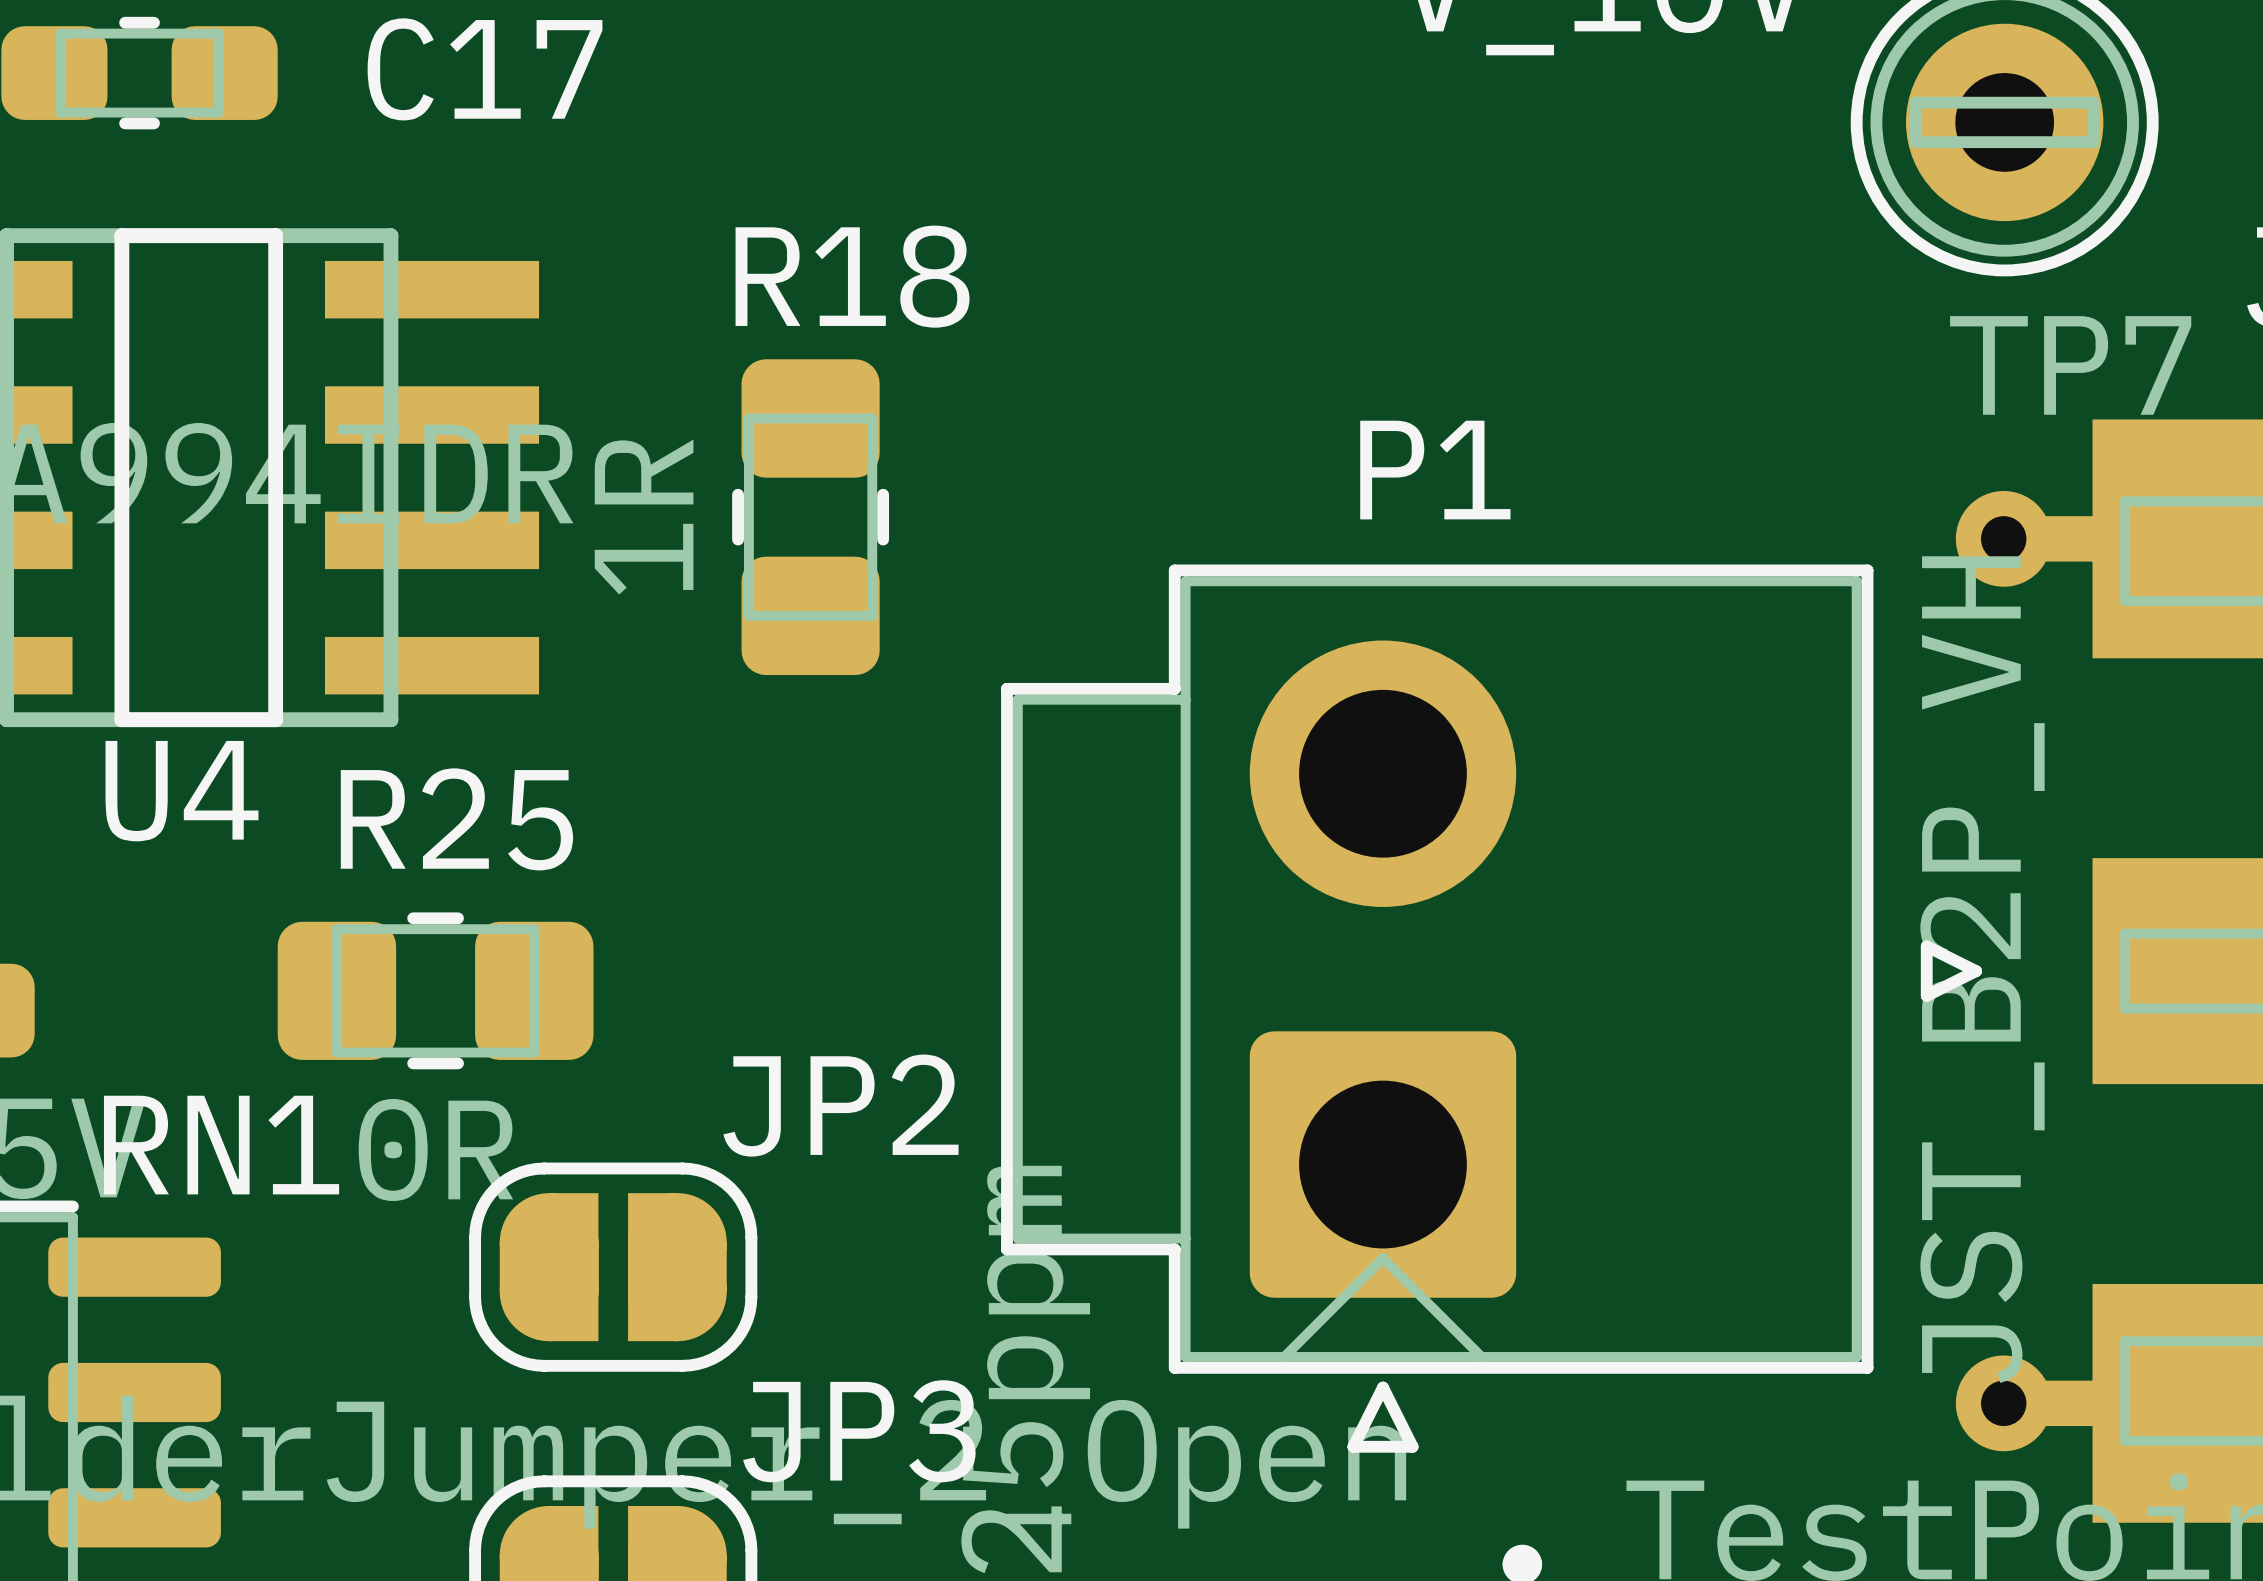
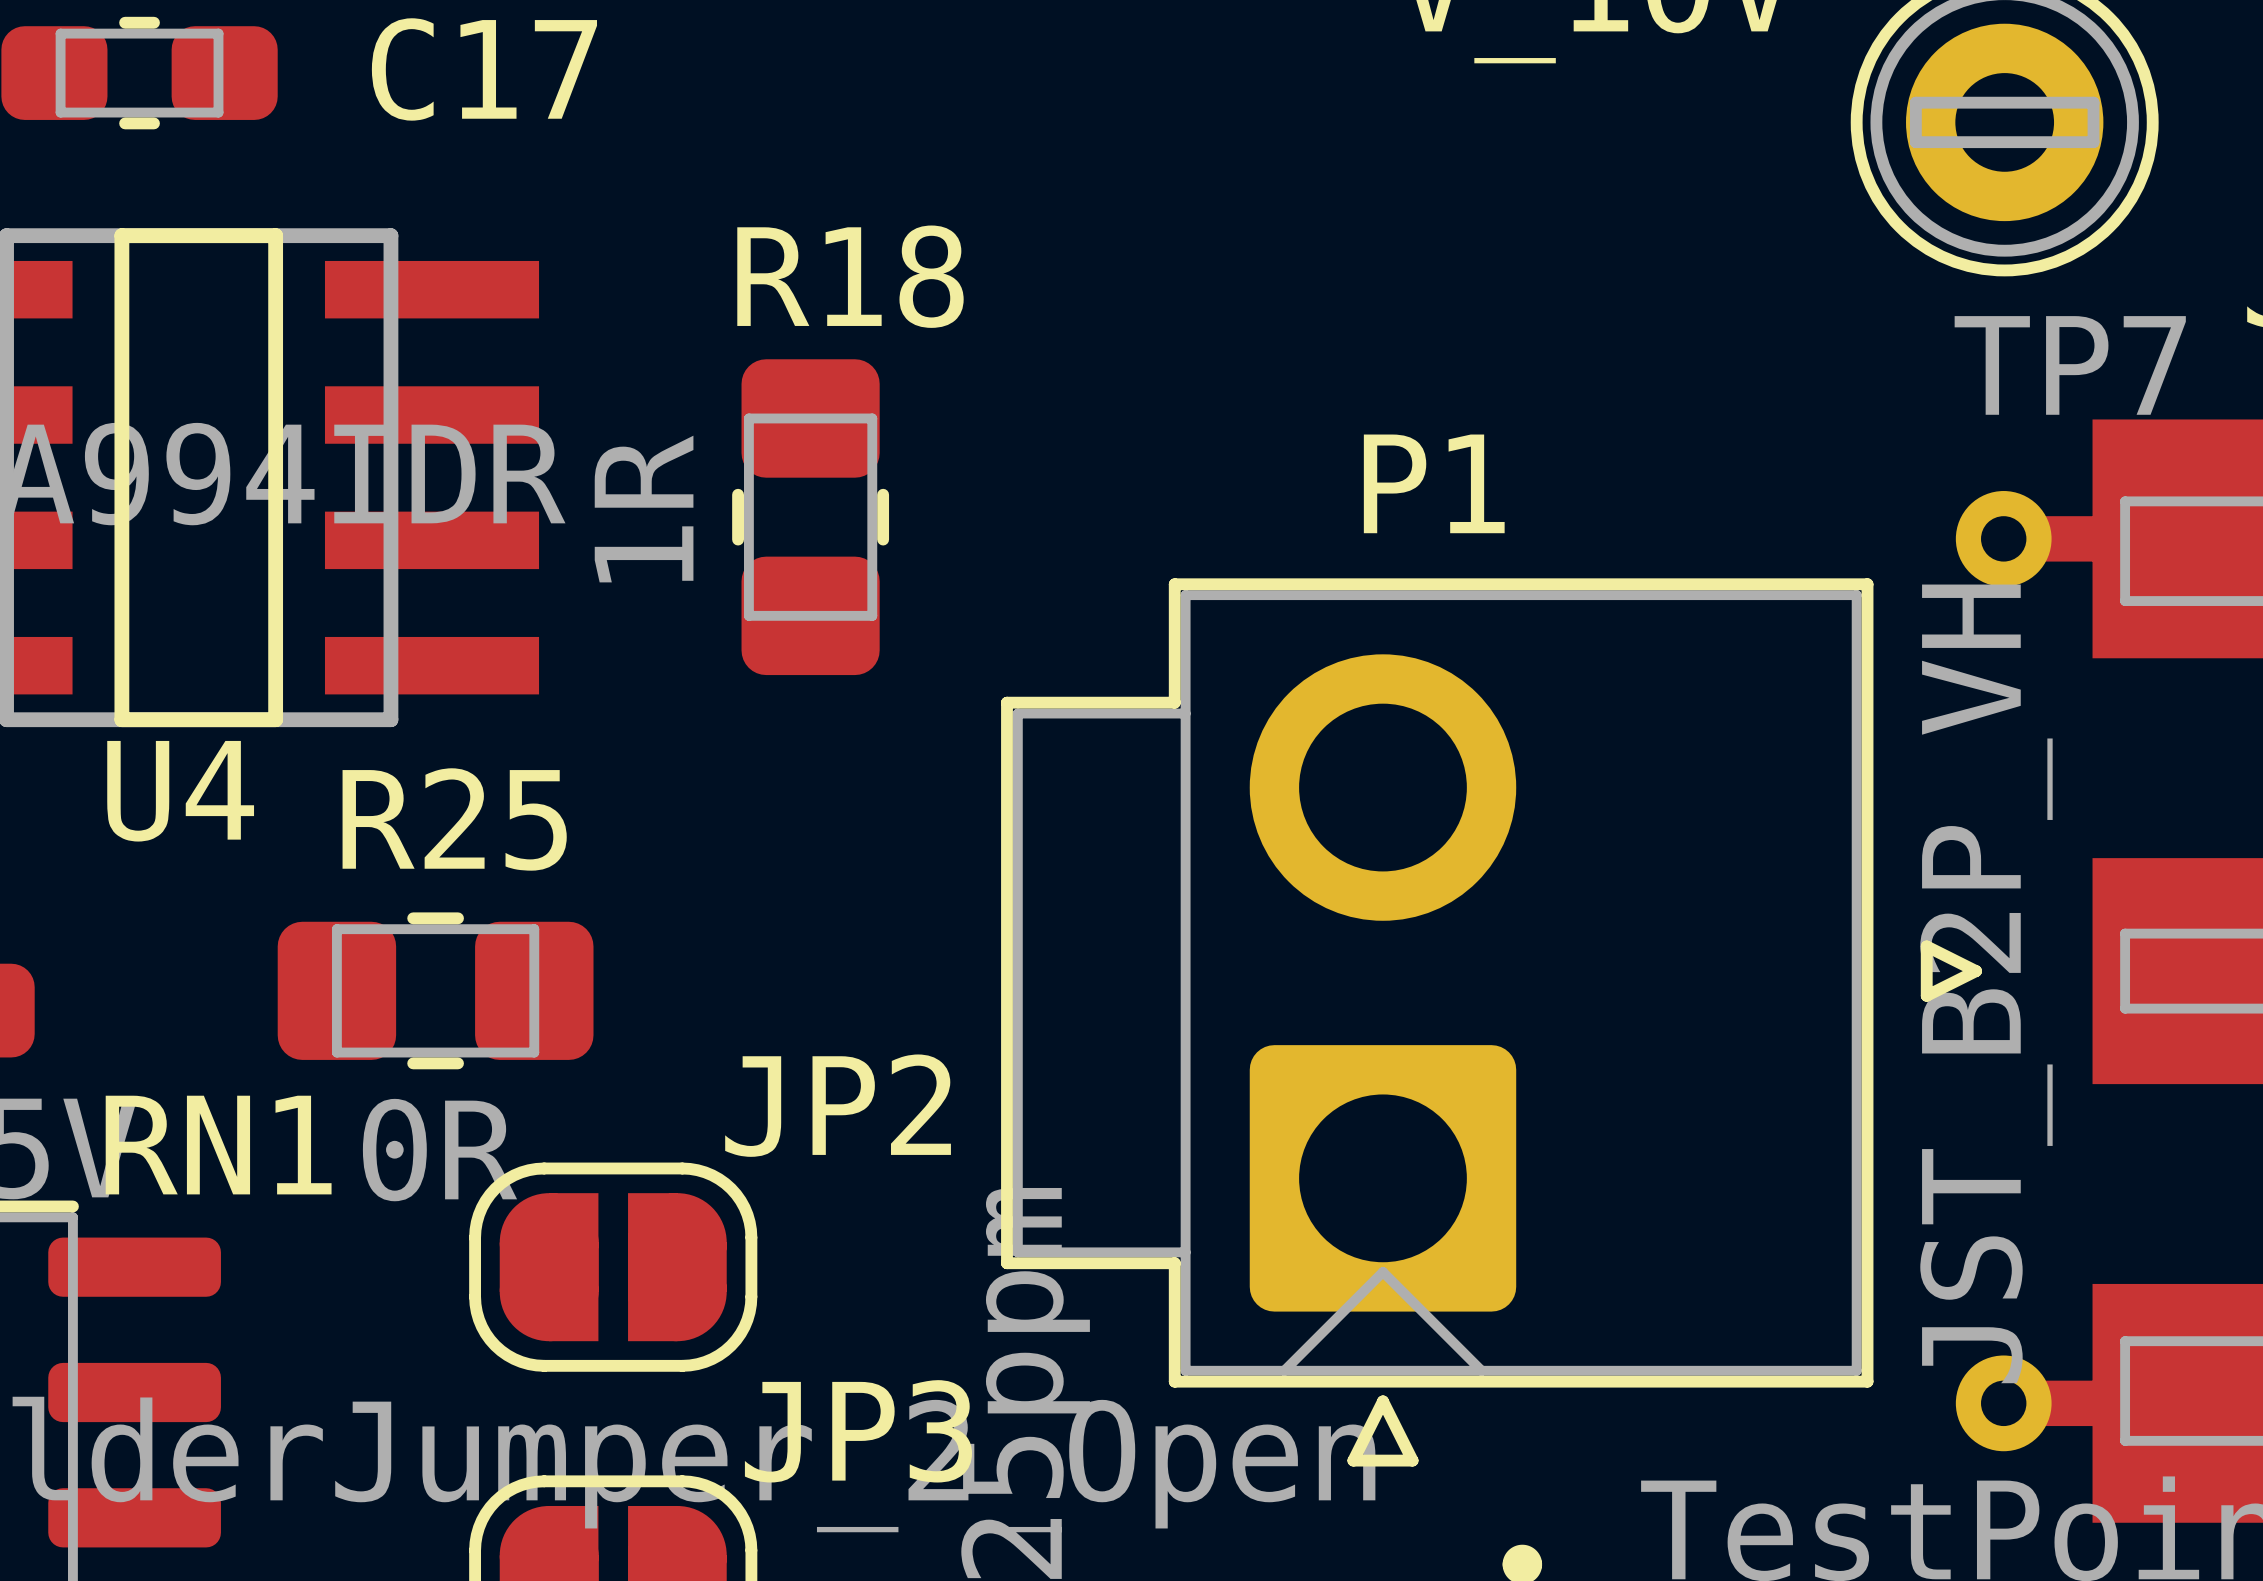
P1 position: (1437, 1008) -> (1437, 1022)

